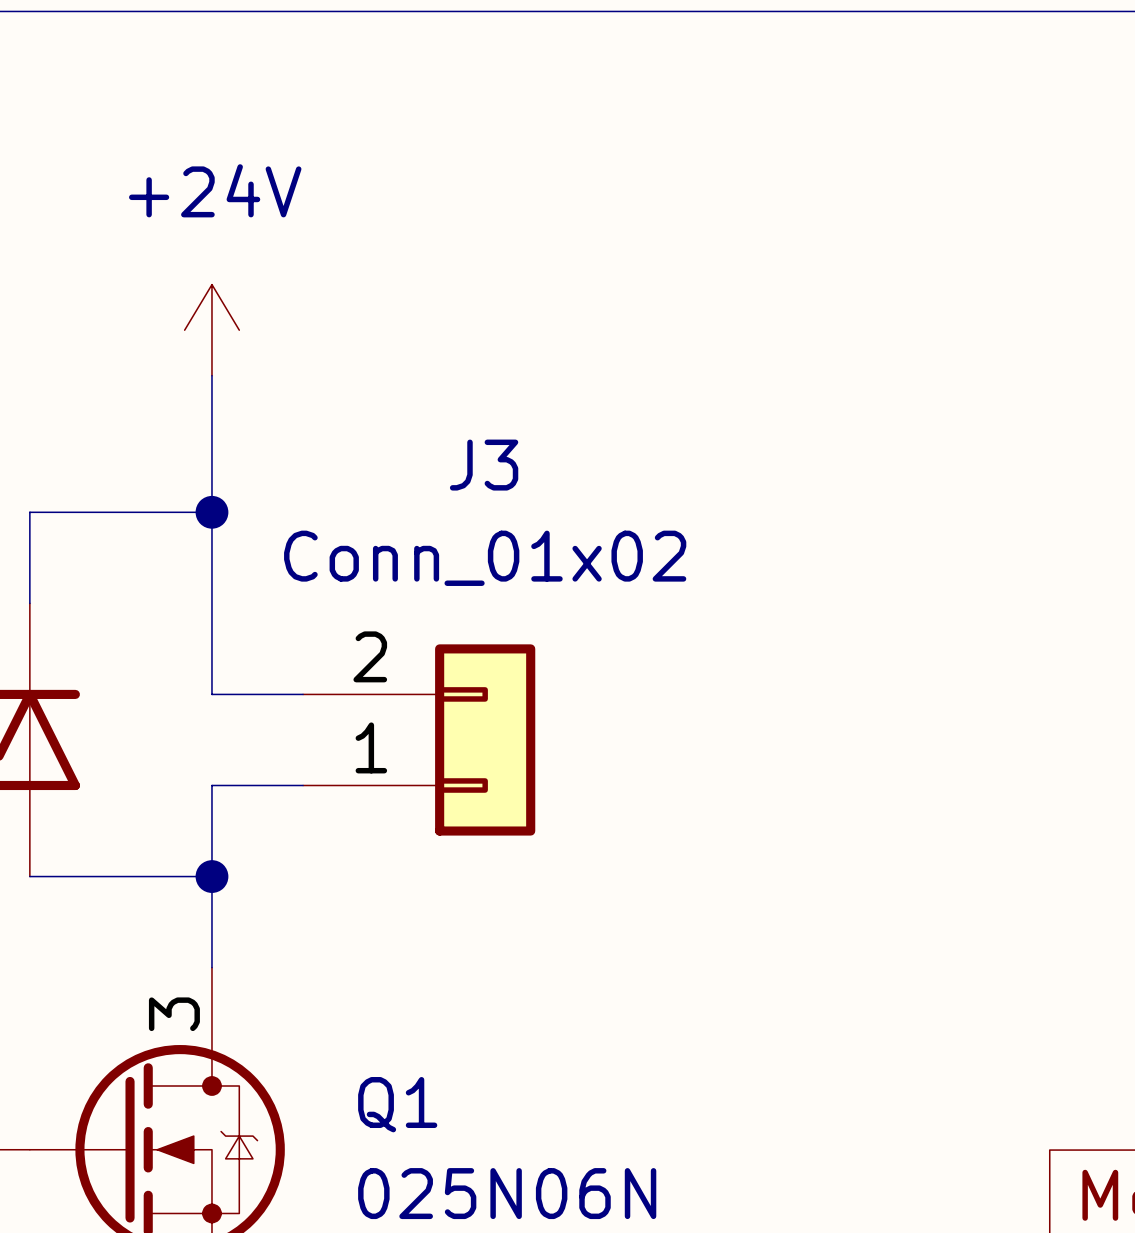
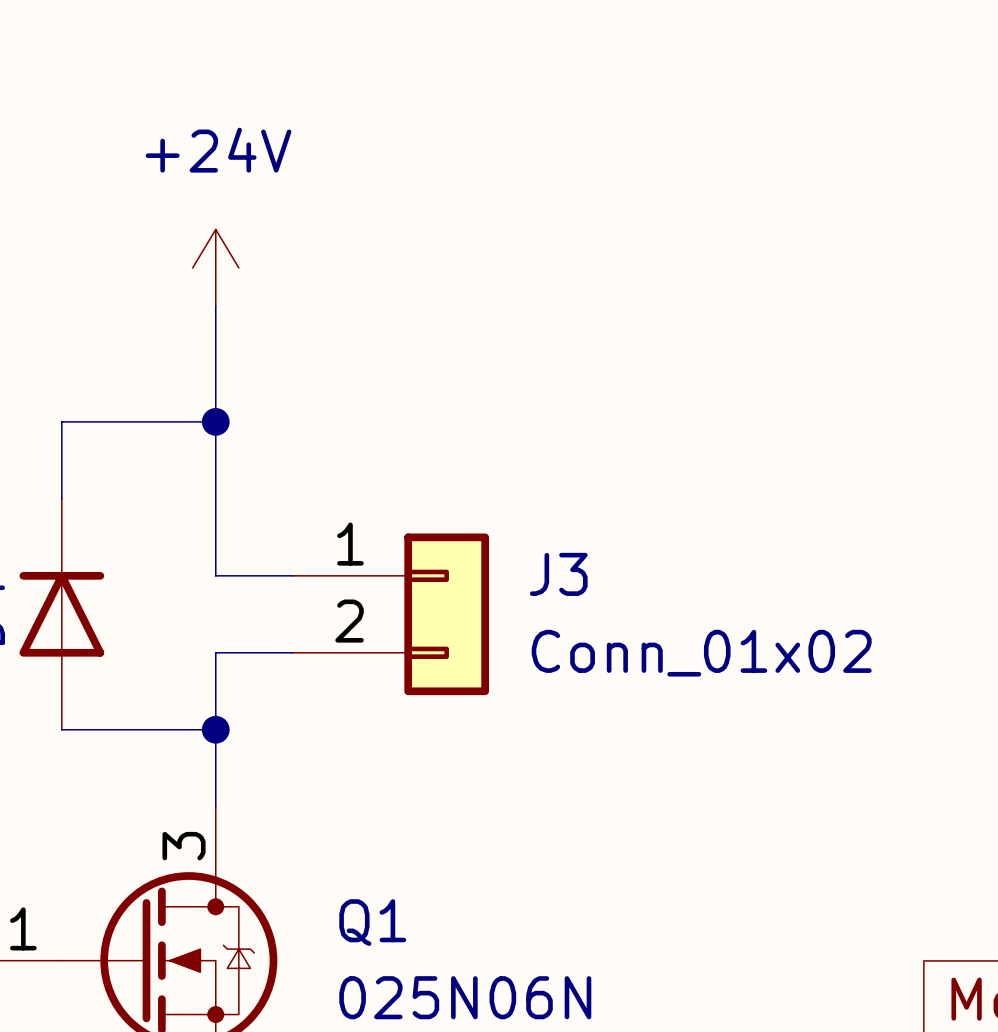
J3 name position: J3 (484, 465) -> J3 (558, 574)
J3 value position: Conn_01x02 (485, 558) -> Conn_01x02 (701, 653)
J3 flip: as is (485, 739) -> up-down (446, 614)

